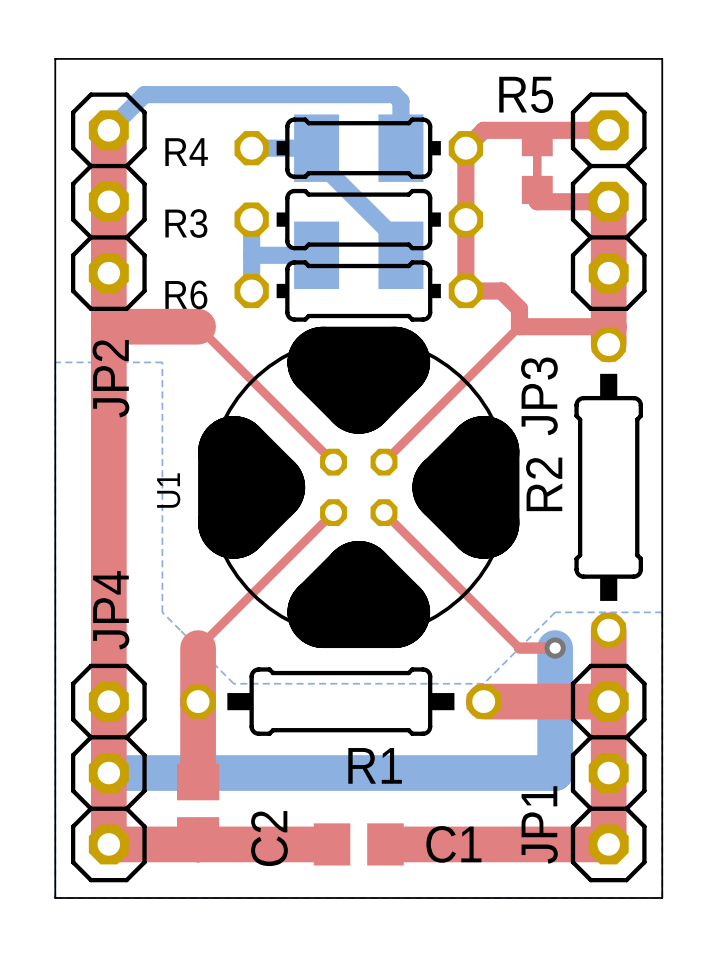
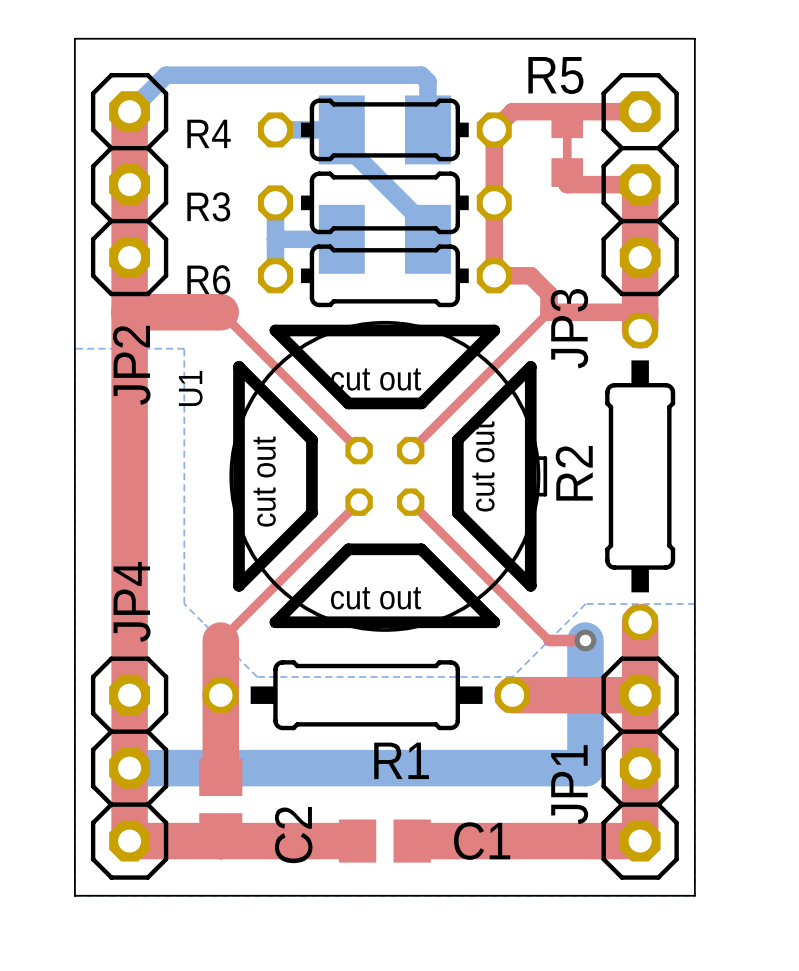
board edge: (323, 362) (358, 398) (394, 362) (323, 362) -> (275, 330) (348, 403) (421, 403) (494, 330) (275, 330)
text: none -> cut out (376, 379)
JP3 name position: JP3 (539, 396) -> JP3 (569, 328)
board edge: (233, 451) (269, 487) (233, 523) (233, 451) -> (239, 366) (239, 585) (311, 512) (311, 439) (239, 366)
board edge: (483, 451) (448, 487) (483, 523) (483, 451) -> (530, 366) (457, 439) (457, 512) (530, 585) (530, 366)
text: none -> cut out (483, 466)
U1 name position: U1 (168, 490) -> U1 (190, 388)
text: none -> cut out (264, 481)
board edge: (358, 576) (394, 612) (323, 612) (358, 576) -> (348, 549) (275, 622) (494, 622) (421, 549) (348, 549)
text: none -> cut out (376, 598)
JP1 name position: JP1 (539, 824) -> JP1 (569, 784)

